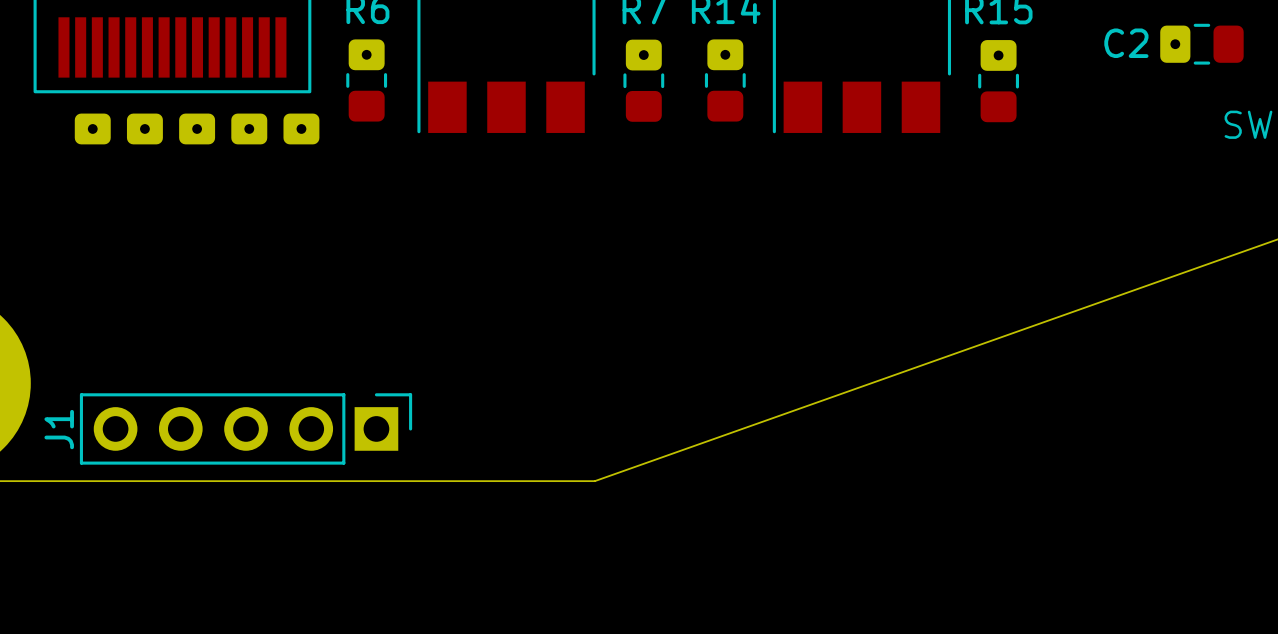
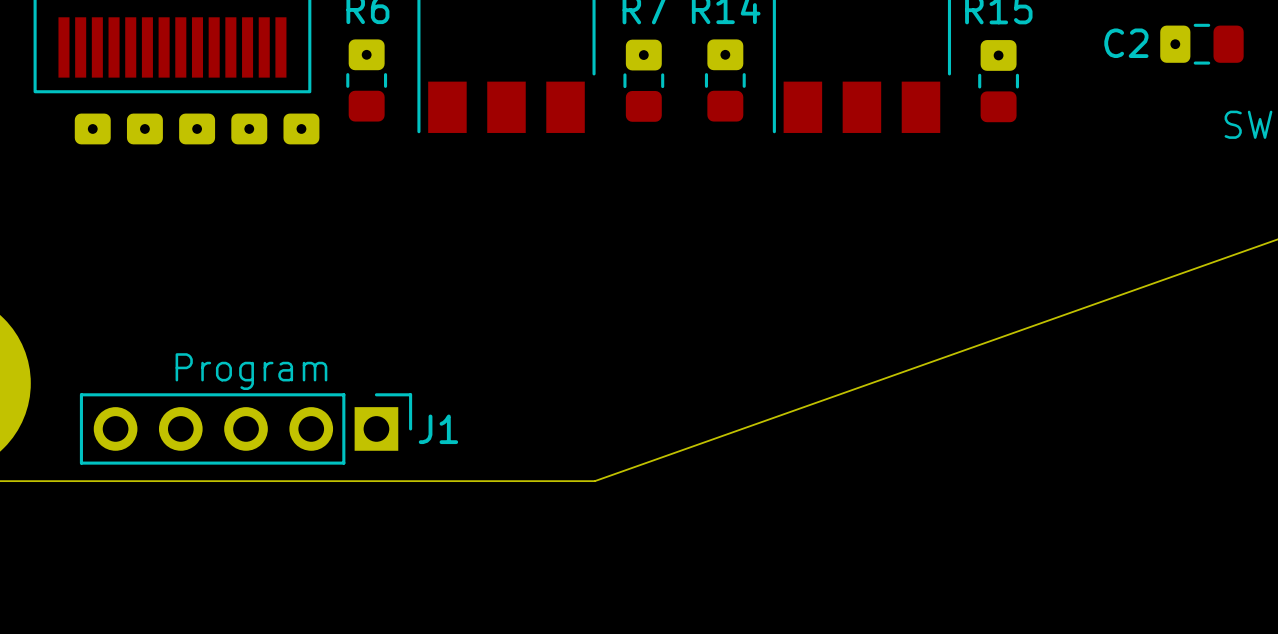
text: none -> Program (251, 371)
J1 name rotation: 0° (59, 429) -> 90° clockwise (438, 429)
J1 name position: J1 (59, 429) -> J1 (438, 429)

